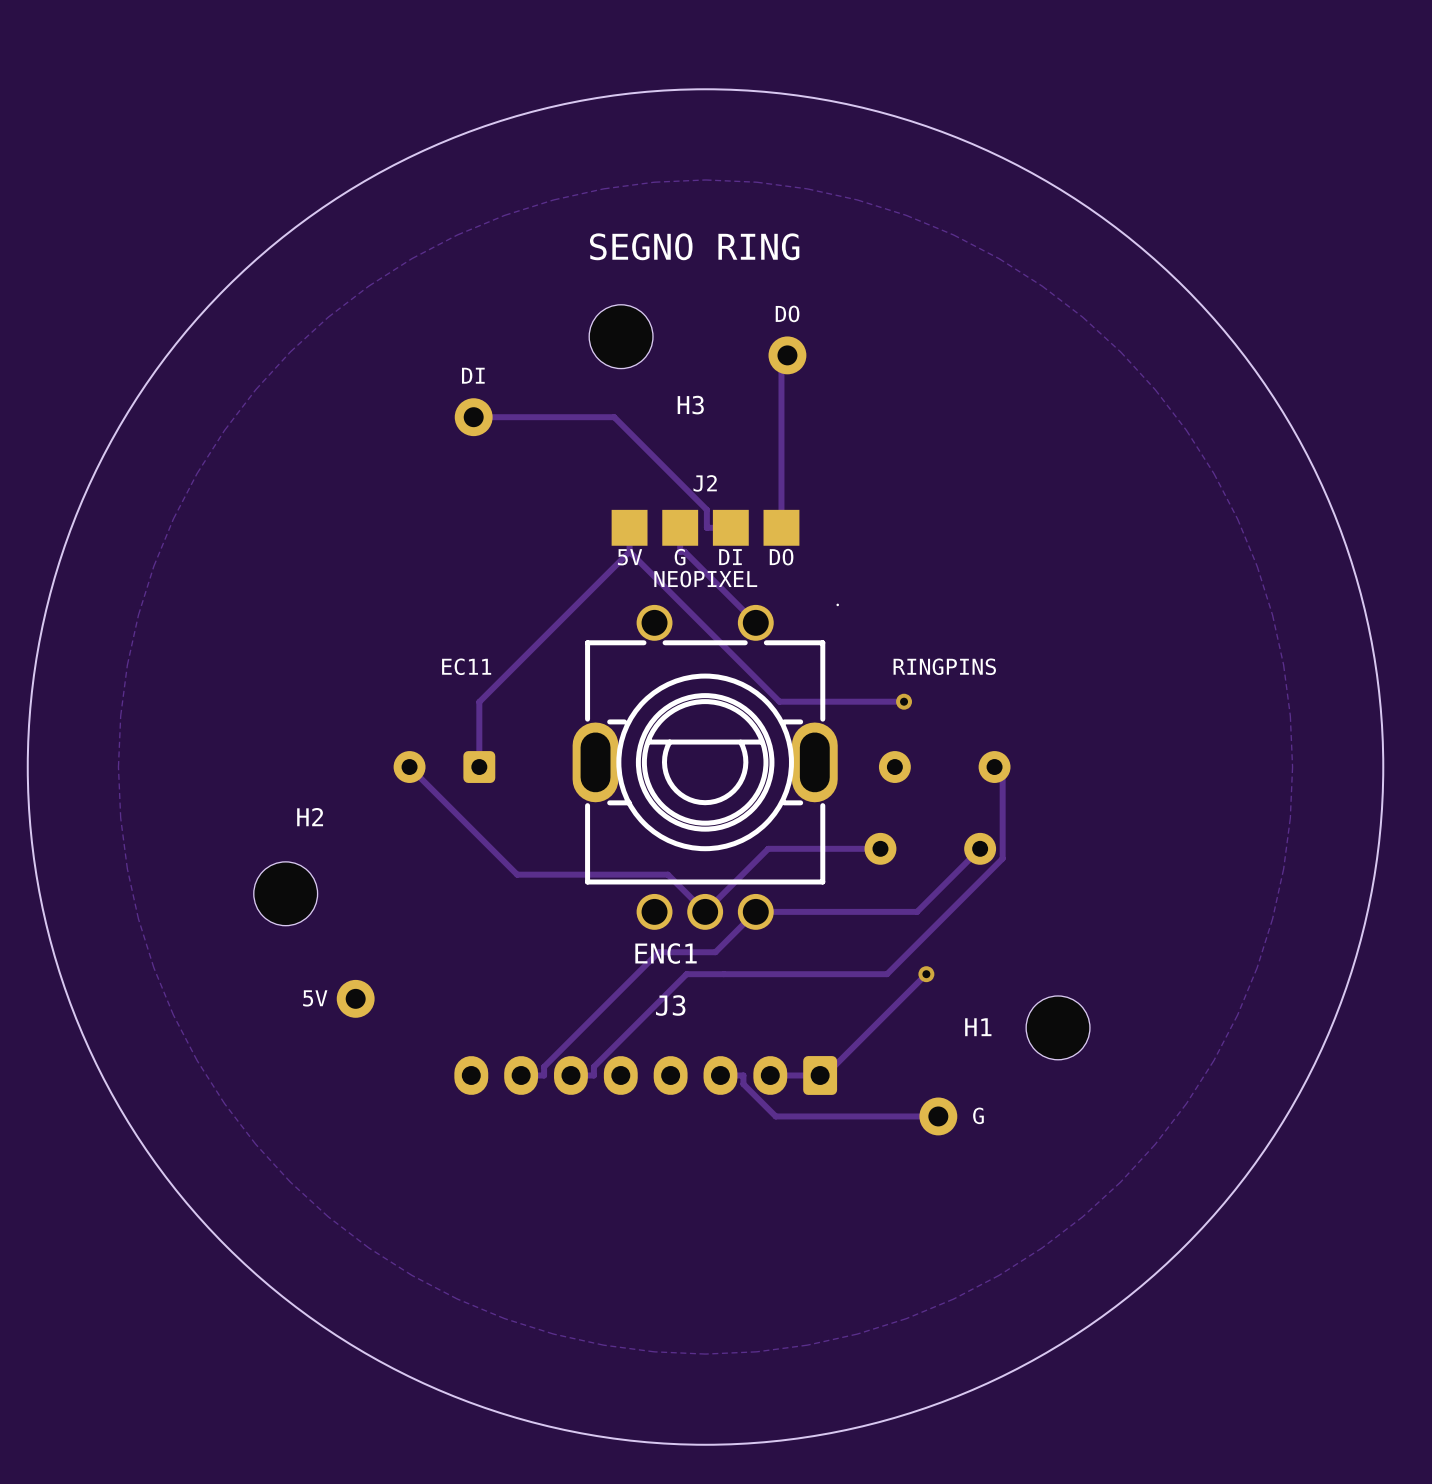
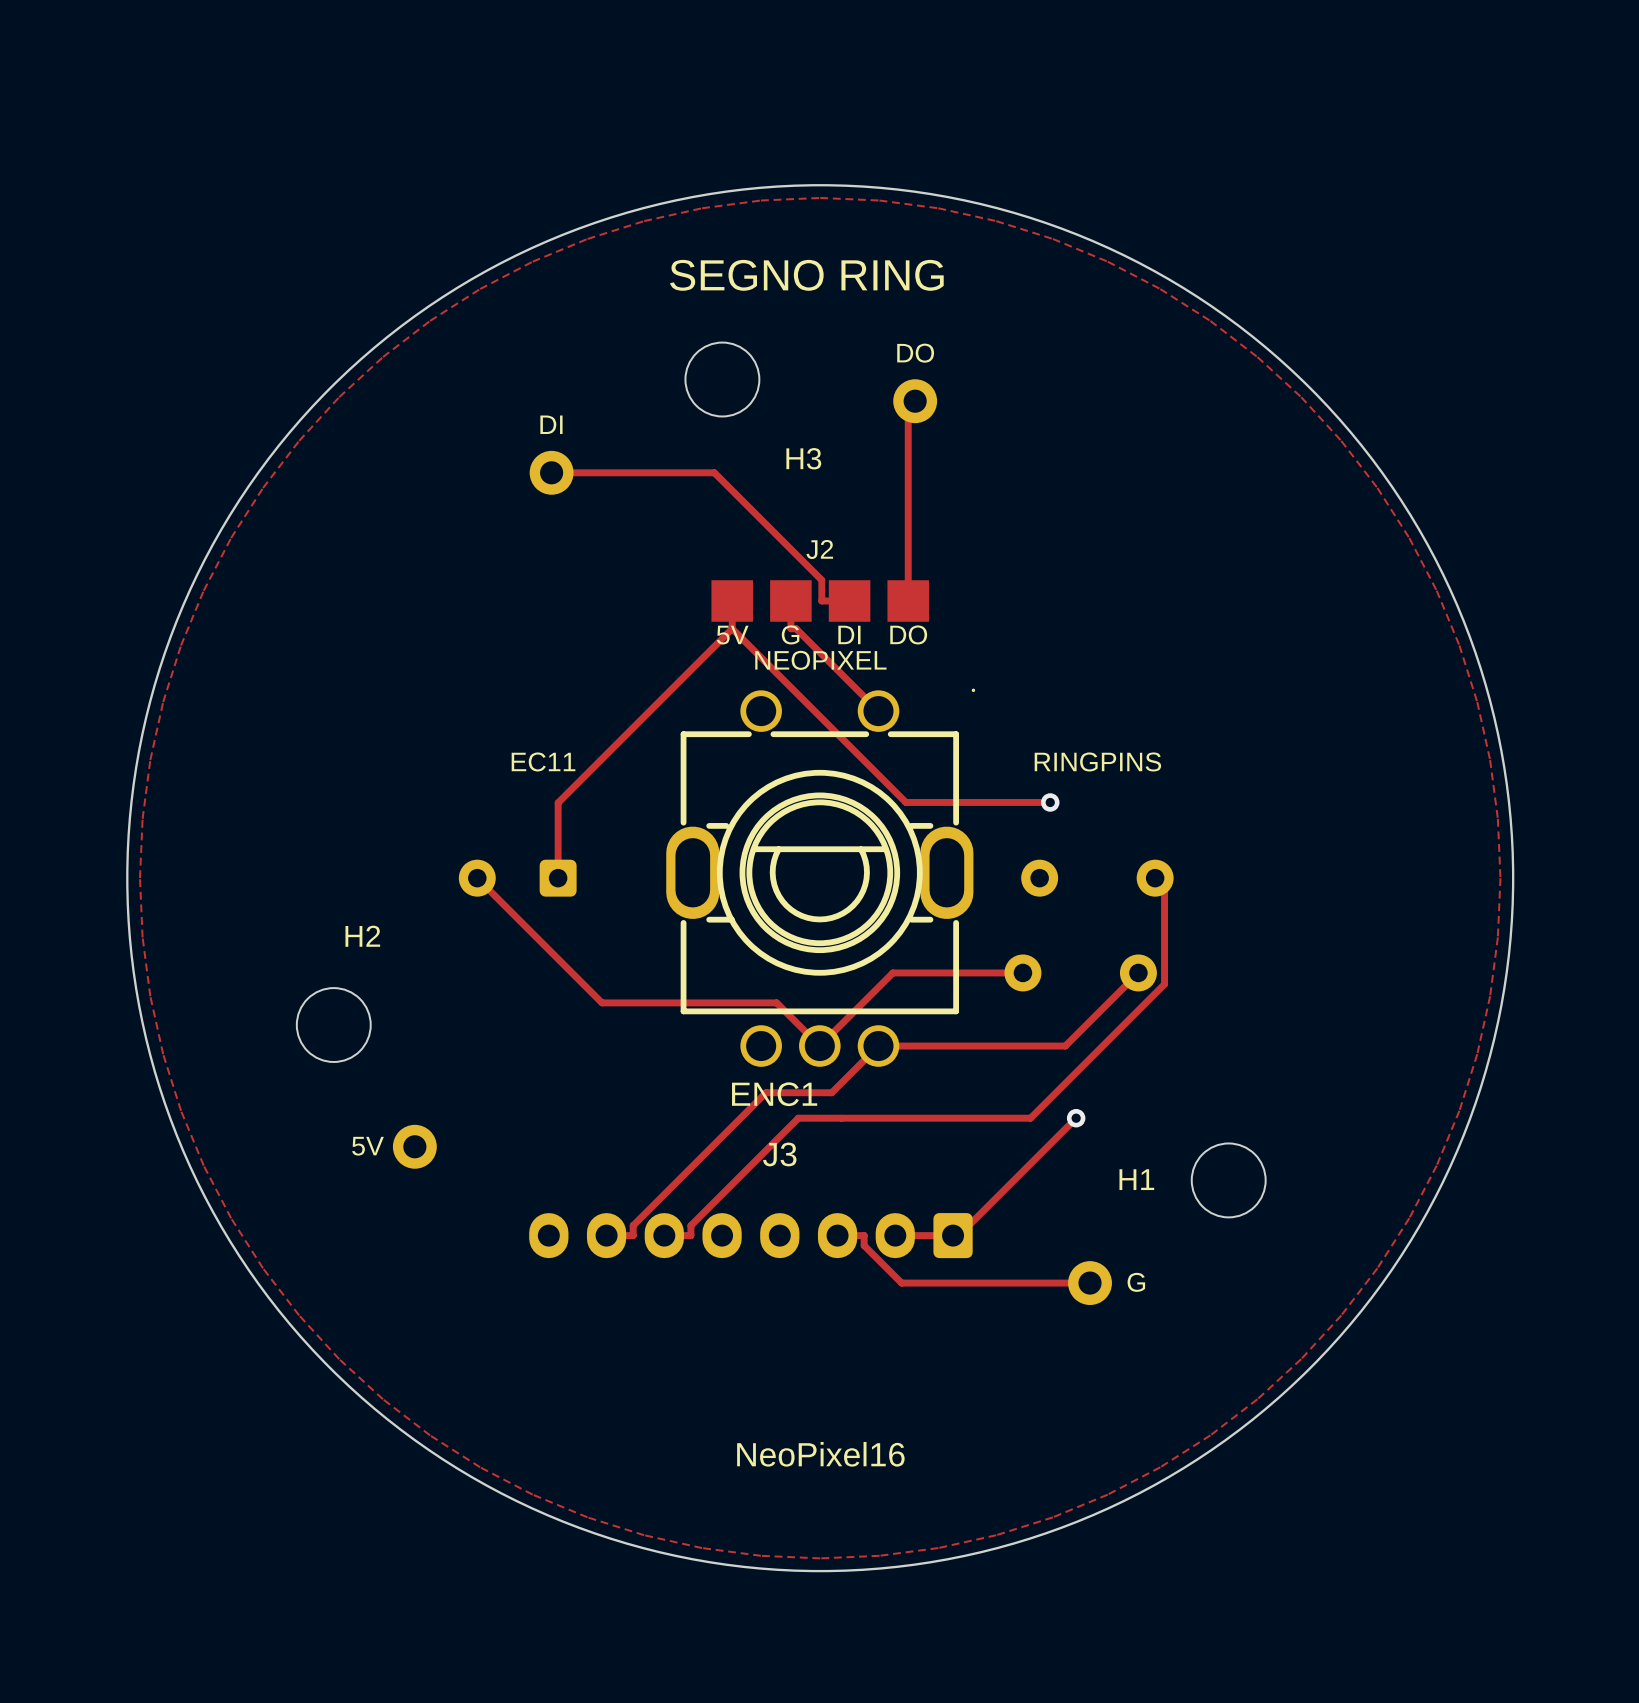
round board edge size: [26, 88, 1385, 1446] -> [126, 184, 1515, 1573]
drawing: none -> [737, 1441, 905, 1467]

